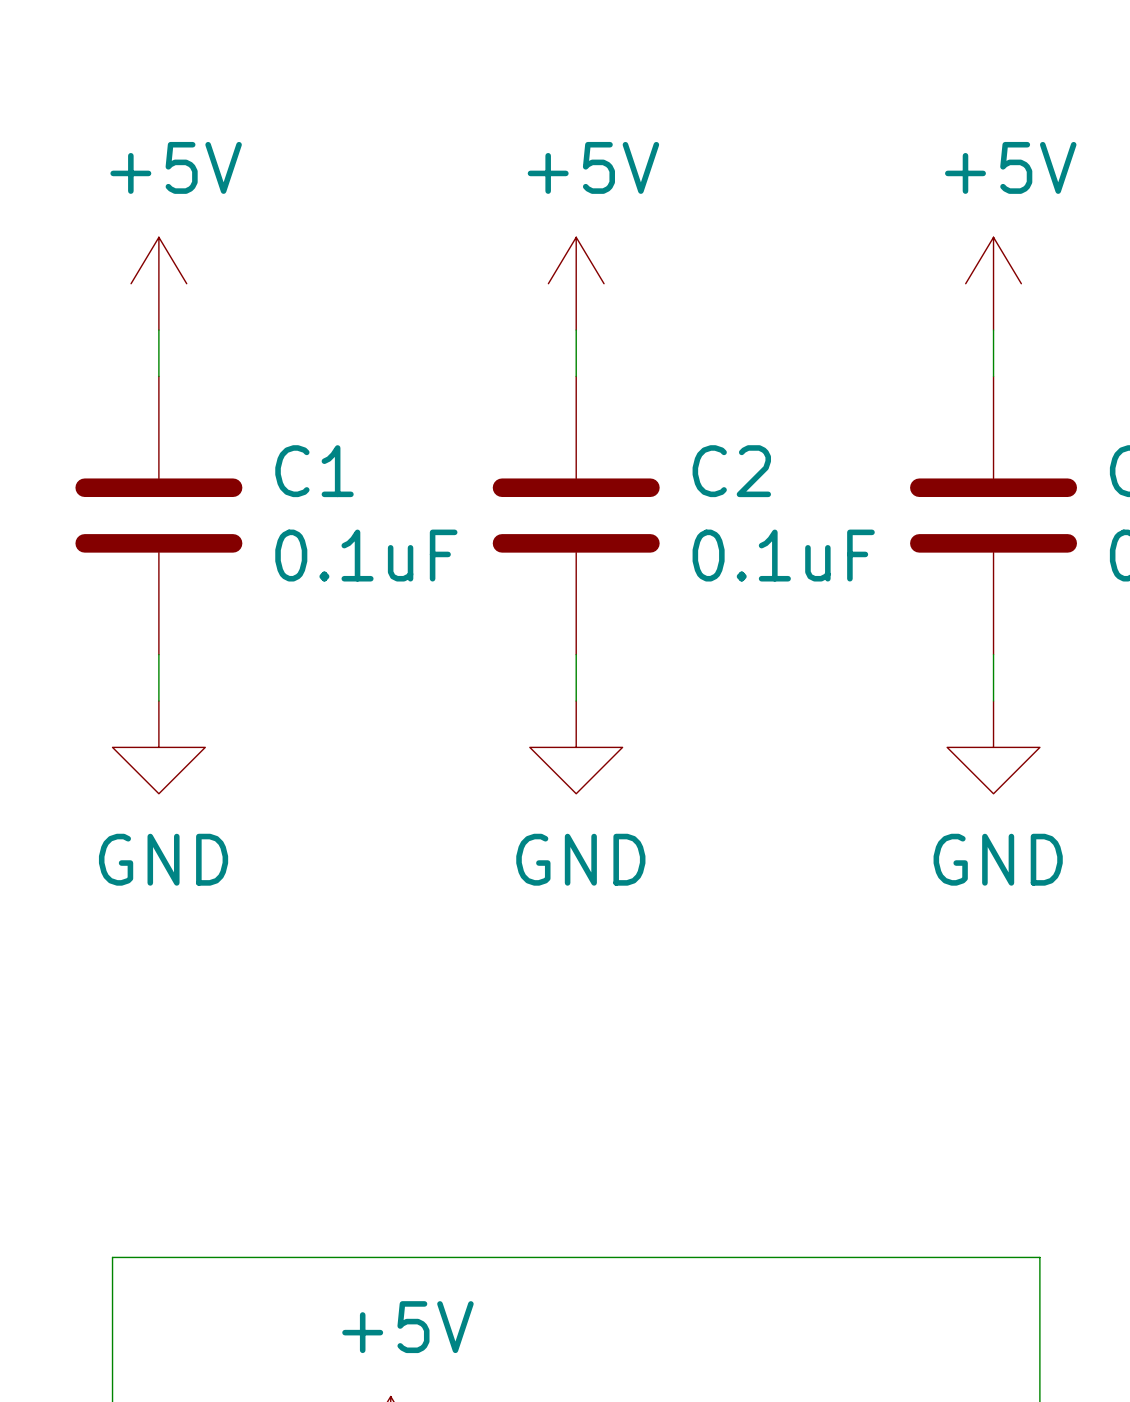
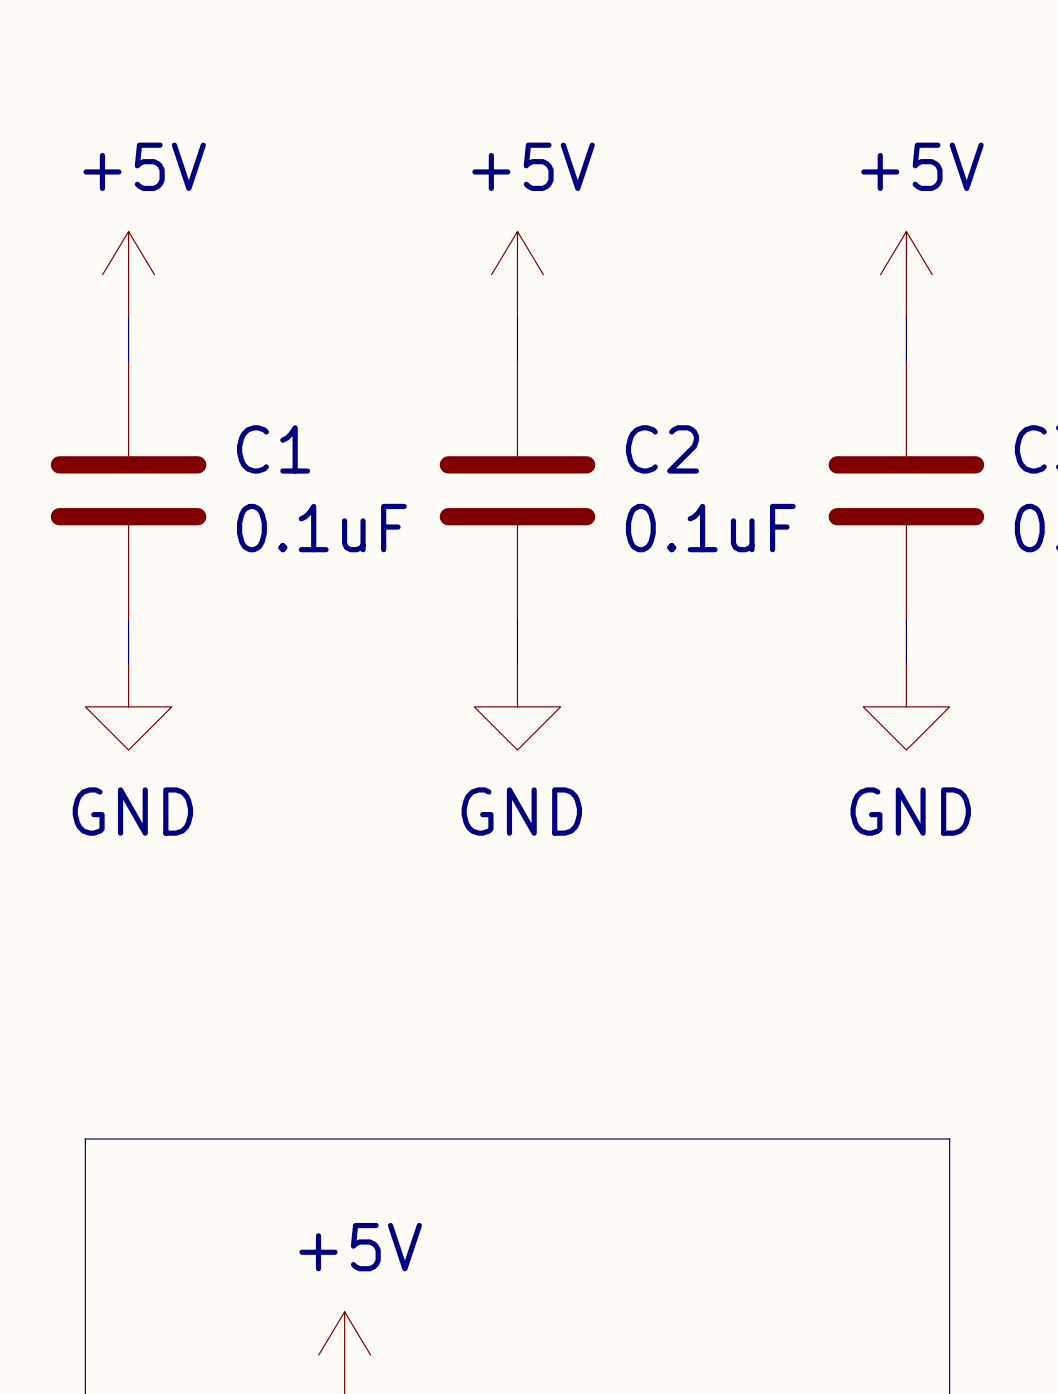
wire: (112, 1257) (1039, 1257) -> (85, 1182) (85, 1138) (949, 1138) (949, 1182)

